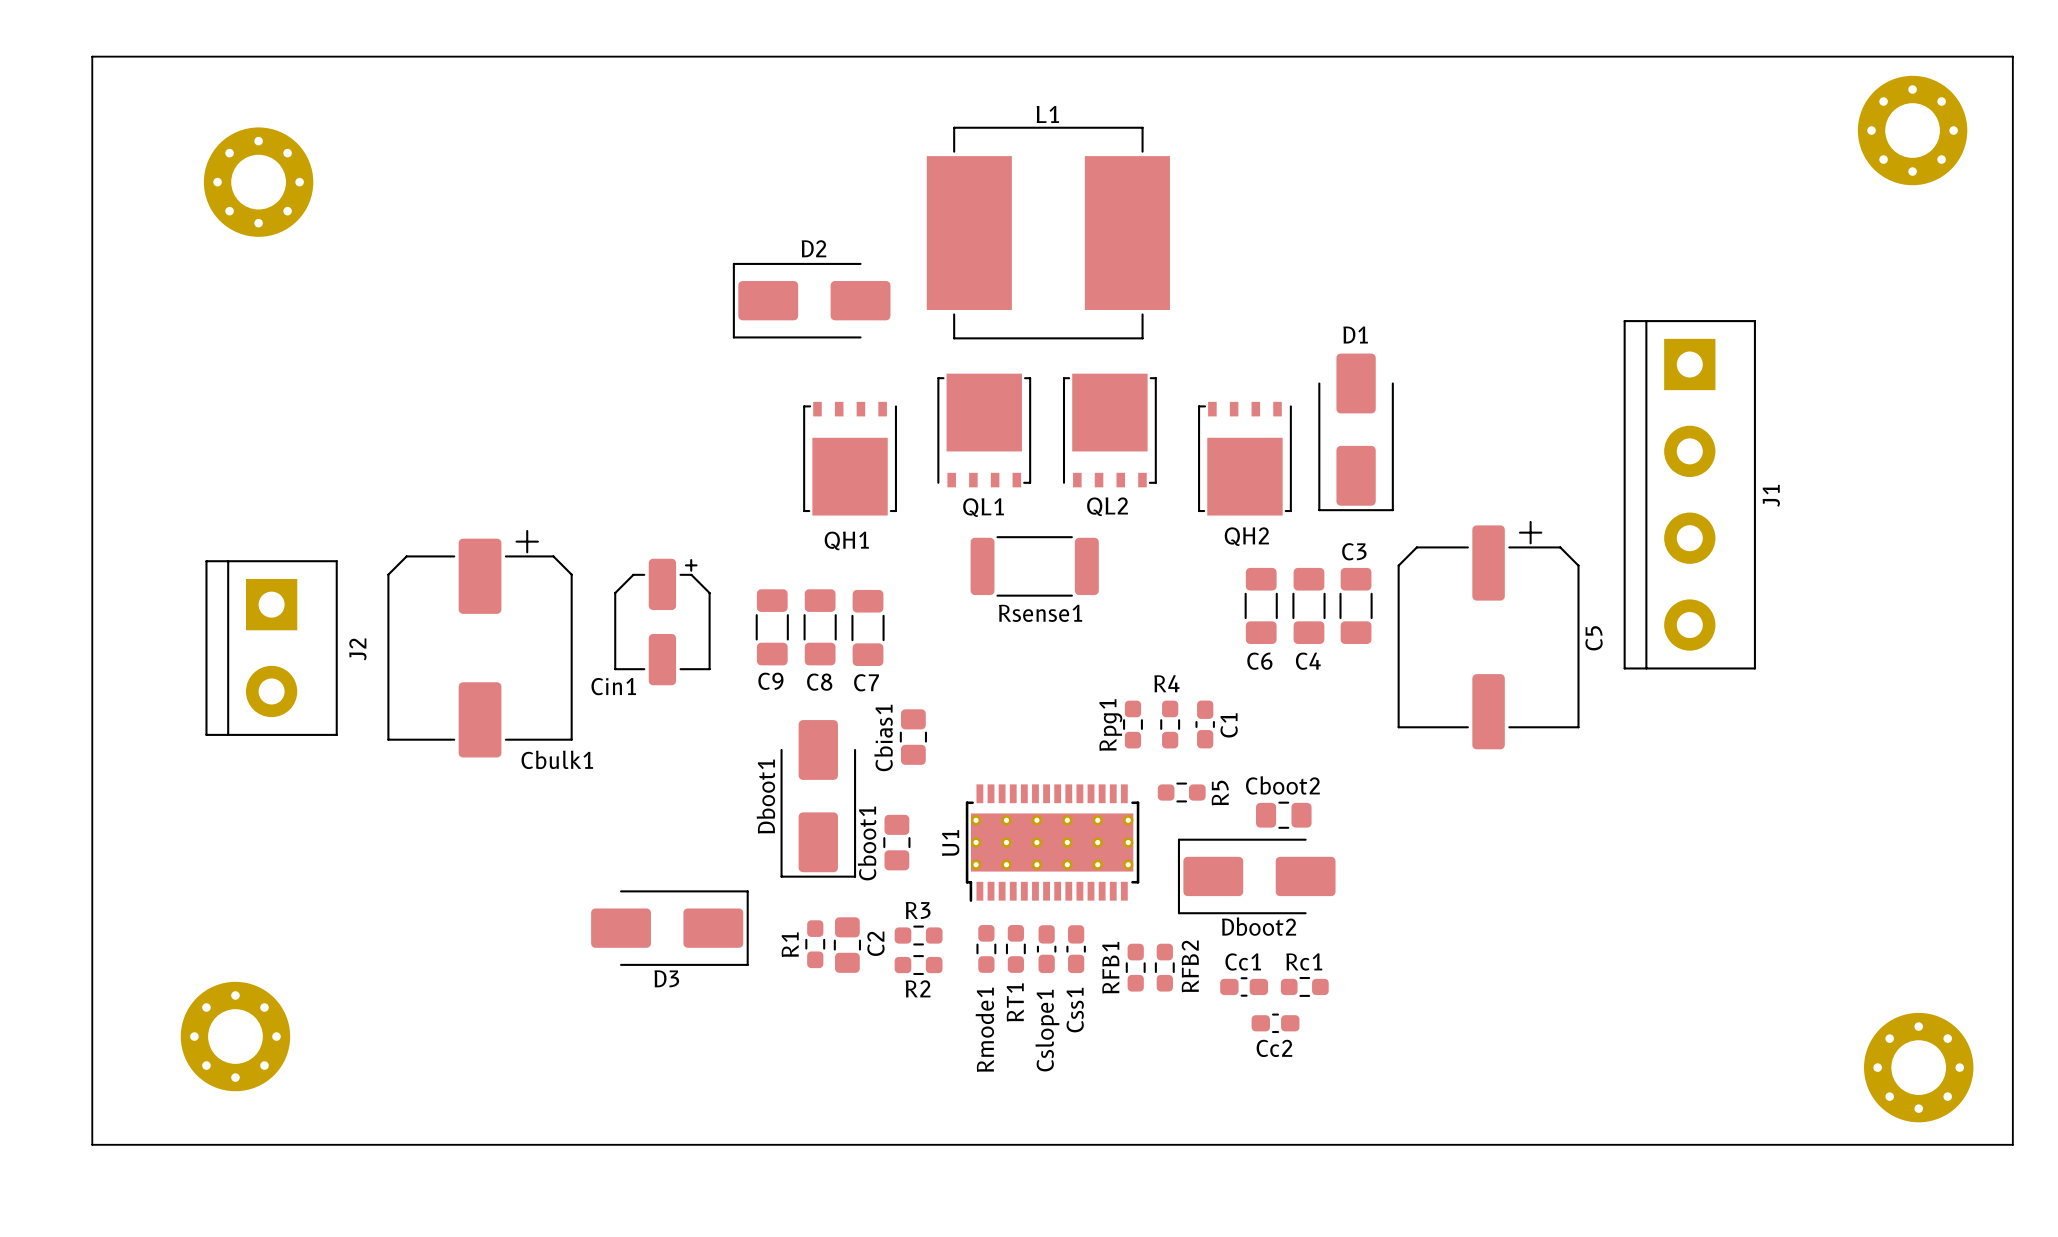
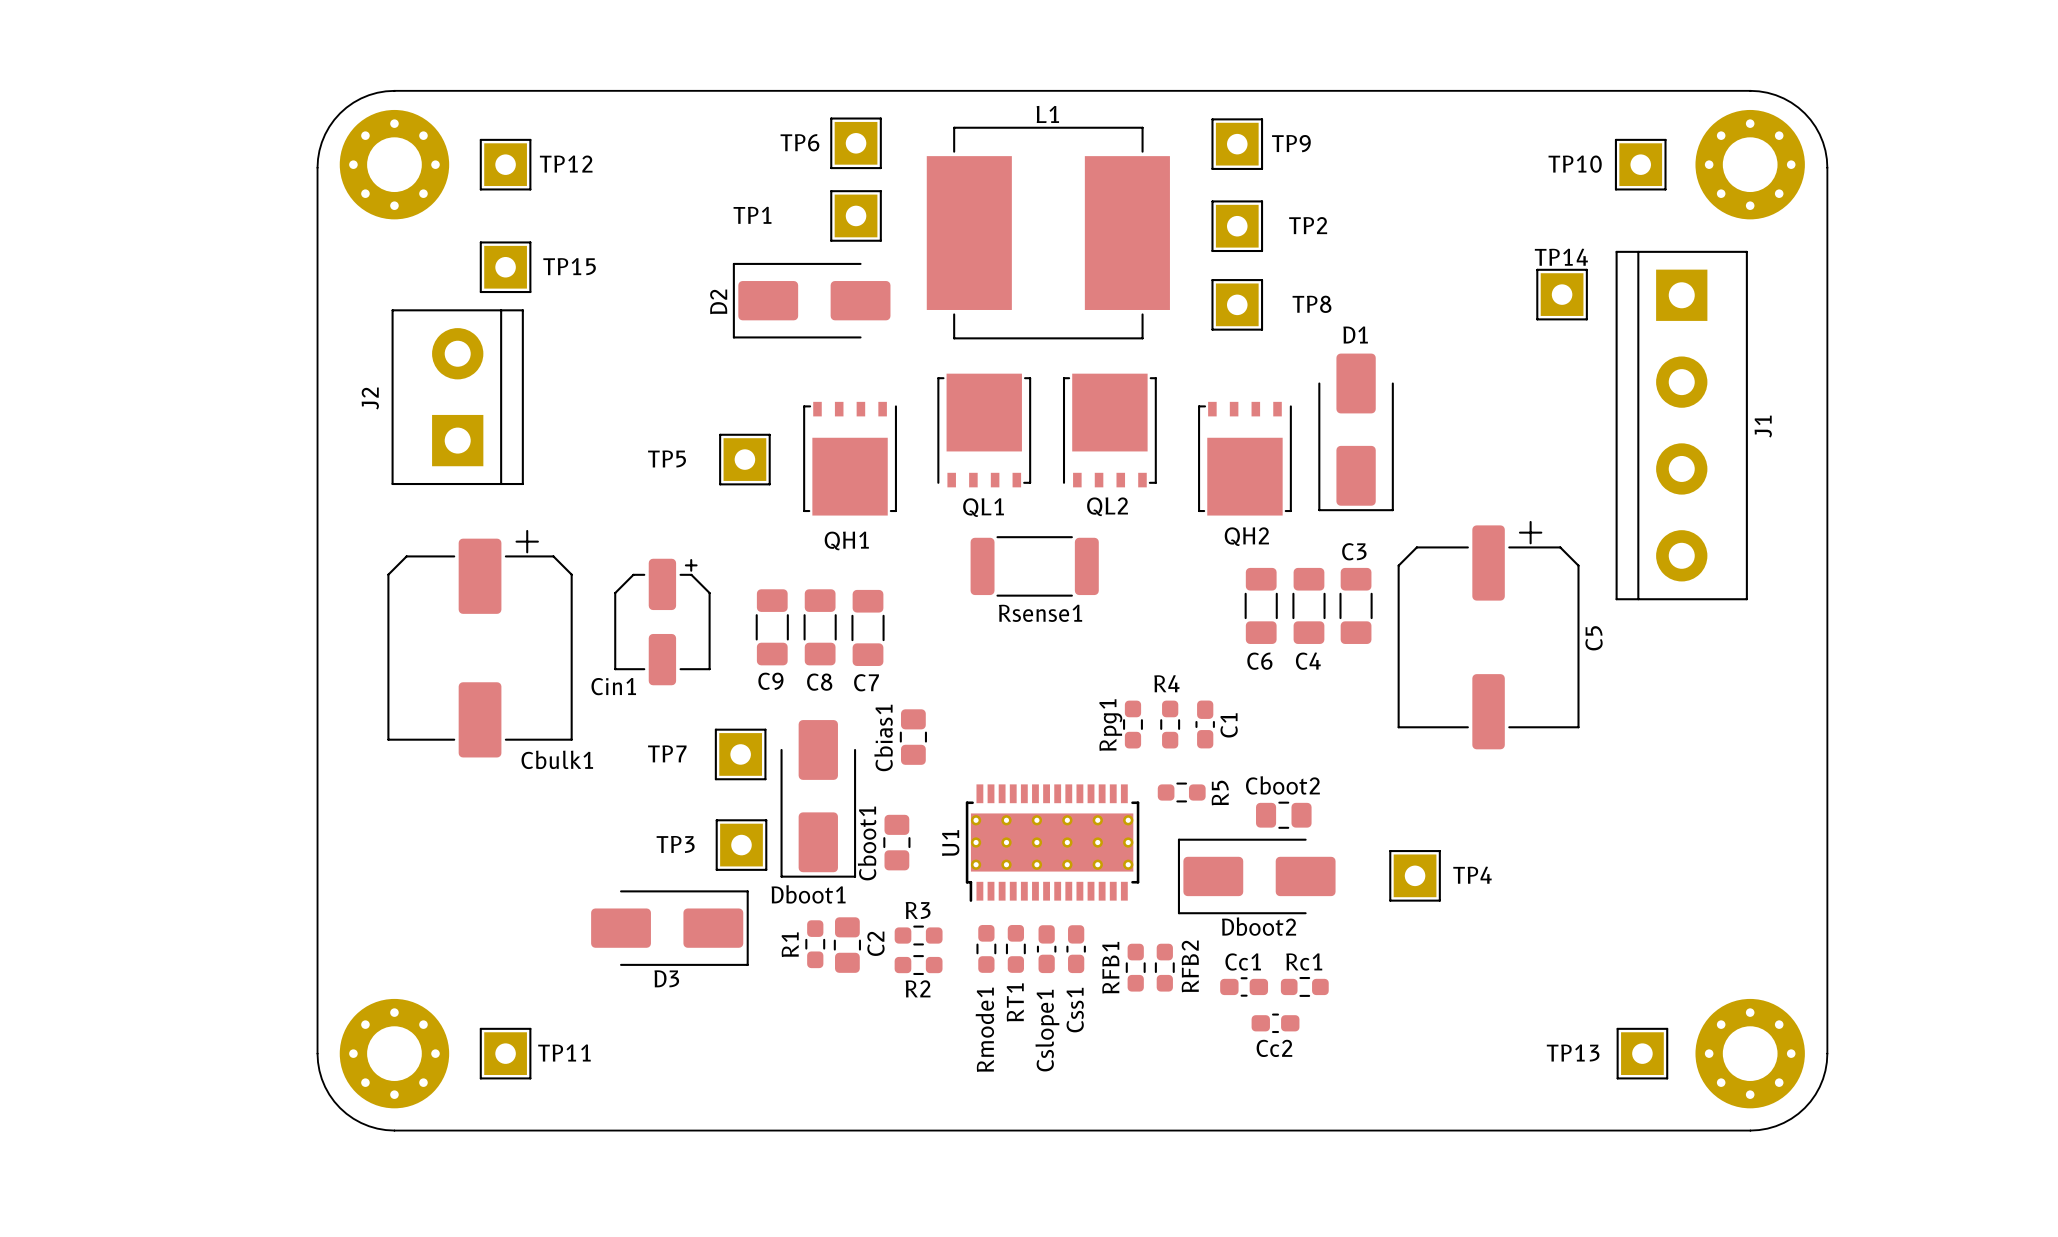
board edge: (92, 56) (2012, 56) (2012, 1144) (92, 1144) (92, 56) -> (394, 90) (369, 95) (353, 102) (340, 113) (329, 126) (321, 142) (317, 167) (317, 1053) (319, 1070) (325, 1087) (334, 1101) (346, 1113) (369, 1126) (394, 1130) (1750, 1130) (1767, 1128) (1783, 1122) (1798, 1113) (1810, 1101) (1823, 1079) (1827, 1053) (1827, 167) (1825, 150) (1819, 134) (1810, 119) (1798, 107) (1775, 95) (1750, 90) (394, 90)
part position: (1912, 130) -> (1750, 164)
TP6: none -> (856, 143)
TP9: none -> (1237, 144)
TP12: none -> (505, 164)
TP10: none -> (1640, 164)
part position: (258, 182) -> (394, 164)
TP1: none -> (856, 215)
TP2: none -> (1237, 226)
D2 name rotation: 0° (813, 248) -> 90° counterclockwise (718, 301)
D2 name position: D2 (813, 248) -> D2 (718, 301)
TP15: none -> (505, 267)
TP14: none -> (1562, 294)
TP8: none -> (1237, 304)
TP5: none -> (744, 459)
J1 position: (1689, 494) -> (1681, 425)
J2 rotation: 0° (271, 648) -> 180° (457, 397)
J2 position: (271, 648) -> (457, 397)
TP7: none -> (740, 754)
Dboot1 name rotation: 0° (765, 796) -> 90° clockwise (808, 894)
TP3: none -> (741, 845)
TP4: none -> (1415, 875)
part position: (235, 1036) -> (394, 1053)
TP11: none -> (505, 1053)
TP13: none -> (1642, 1053)
part position: (1918, 1067) -> (1750, 1053)

